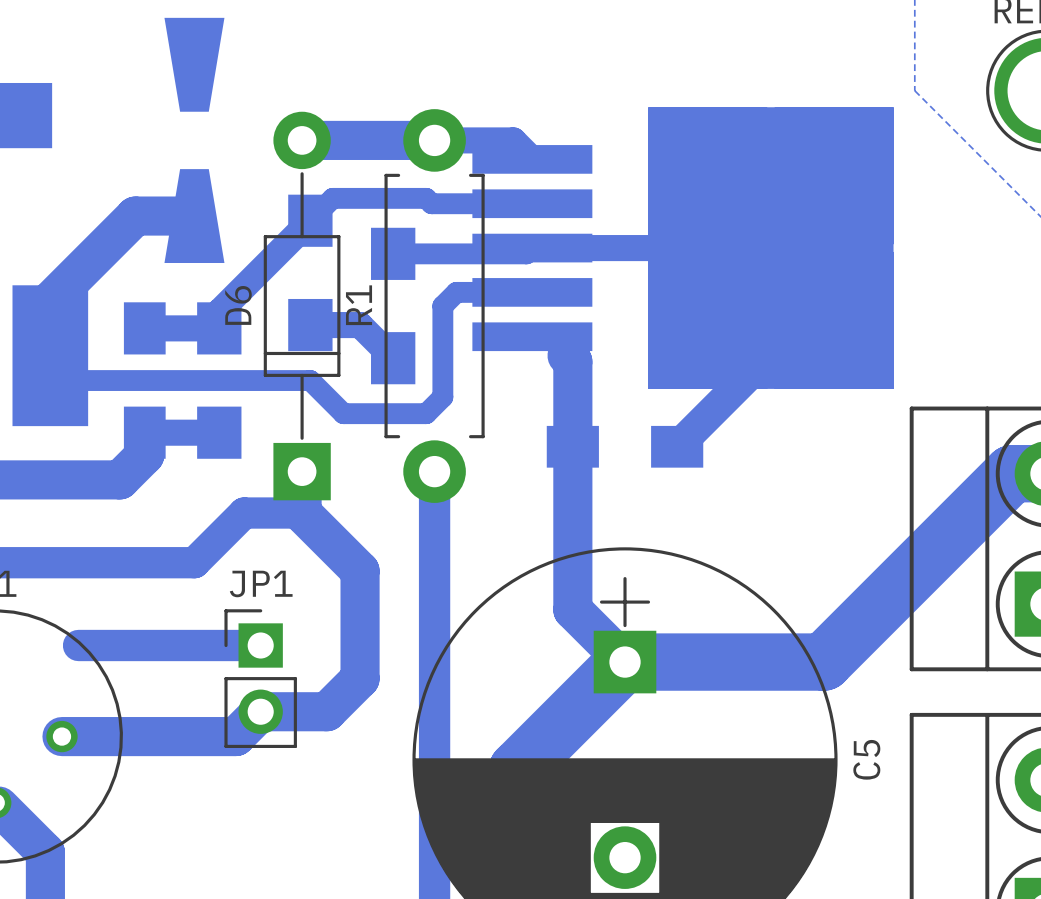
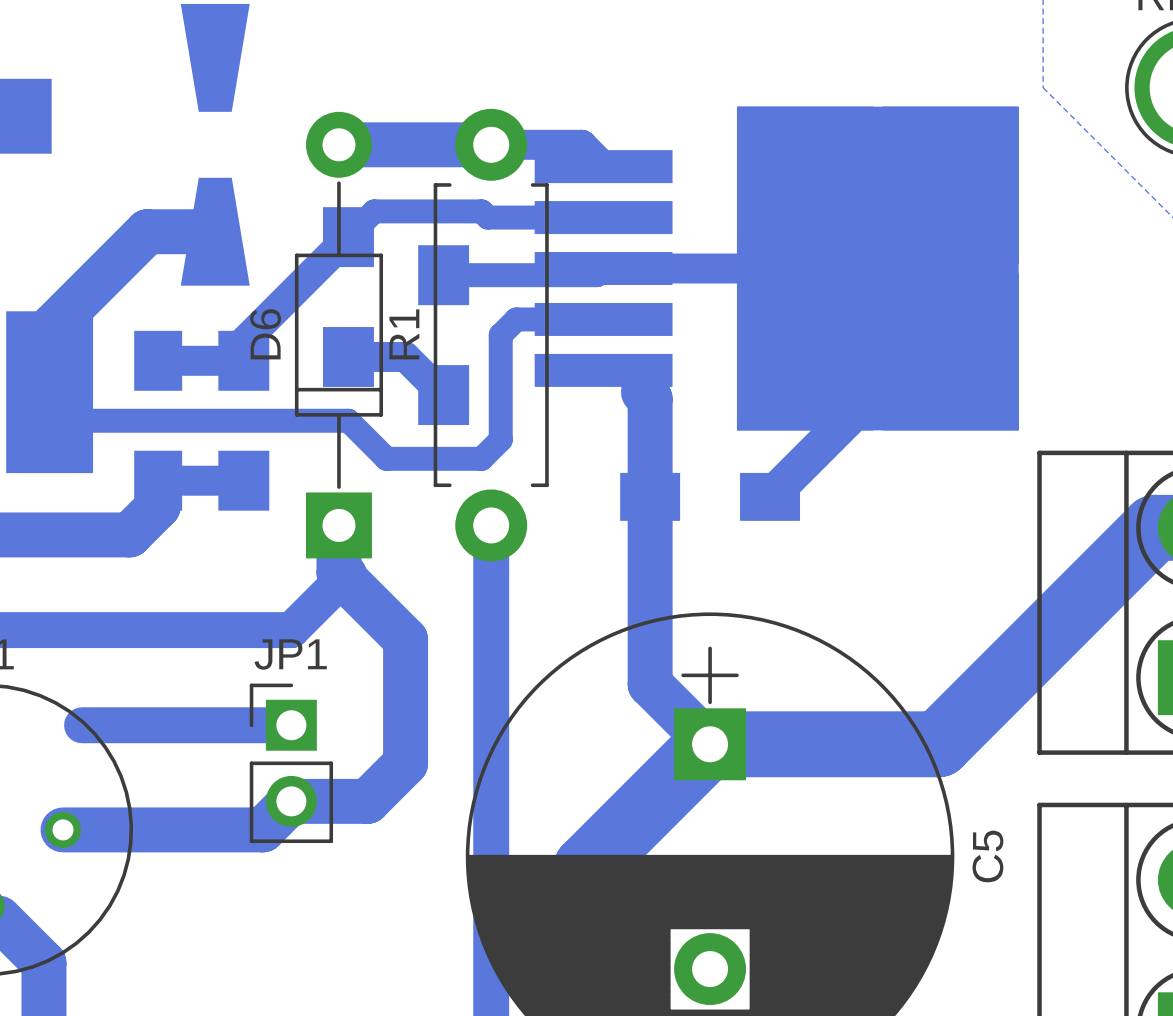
bottom track: (302, 513) (244, 513) (194, 562) -> (338, 573) (348, 573) (291, 630) (215, 630)

